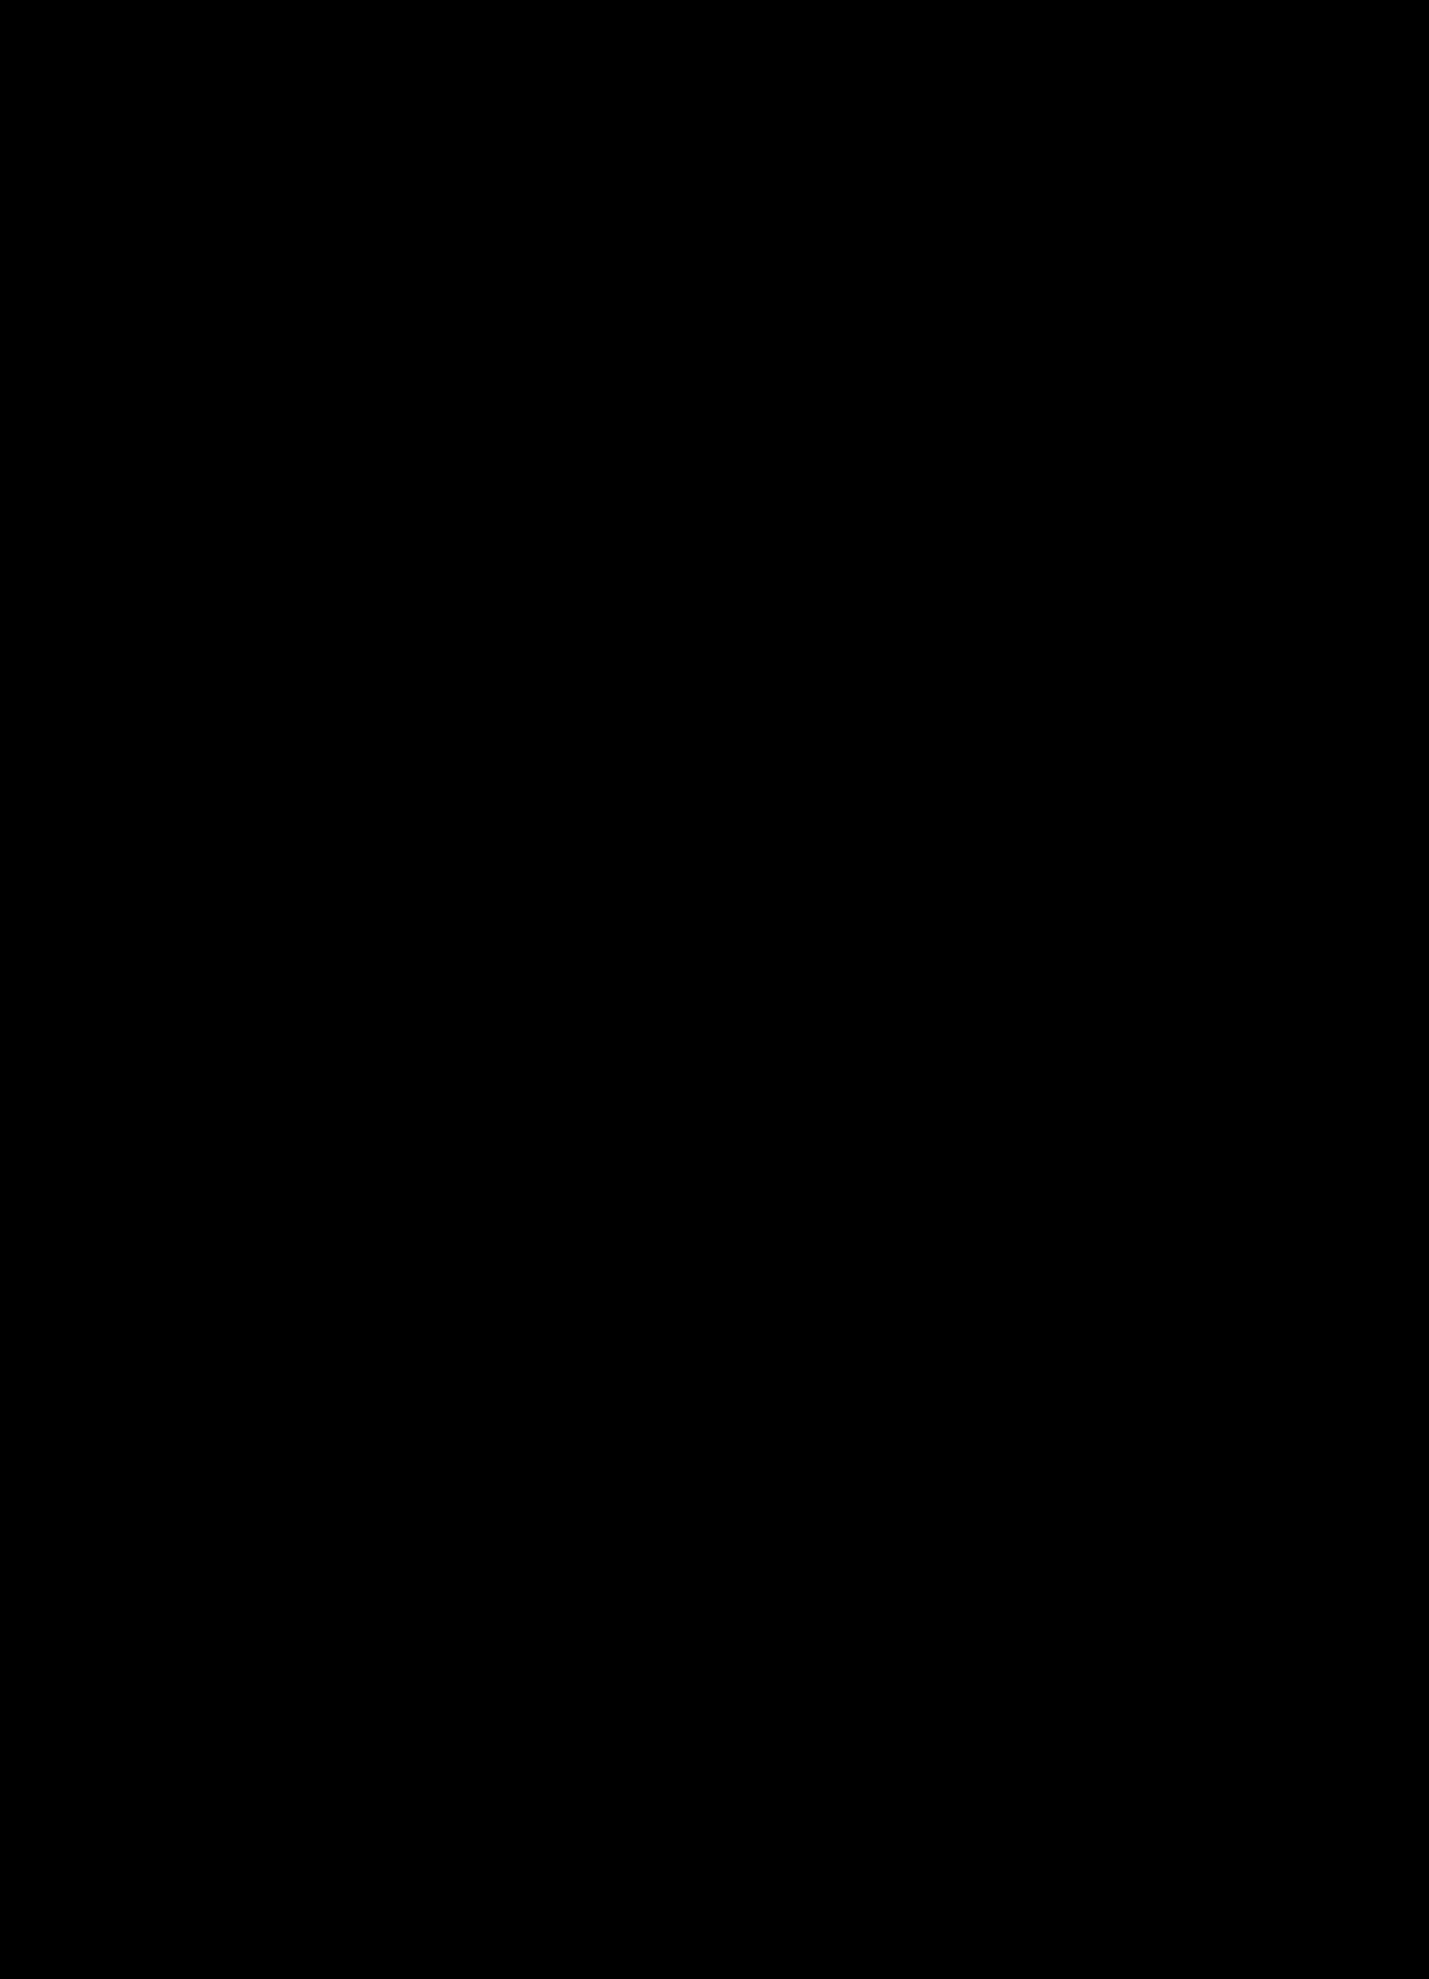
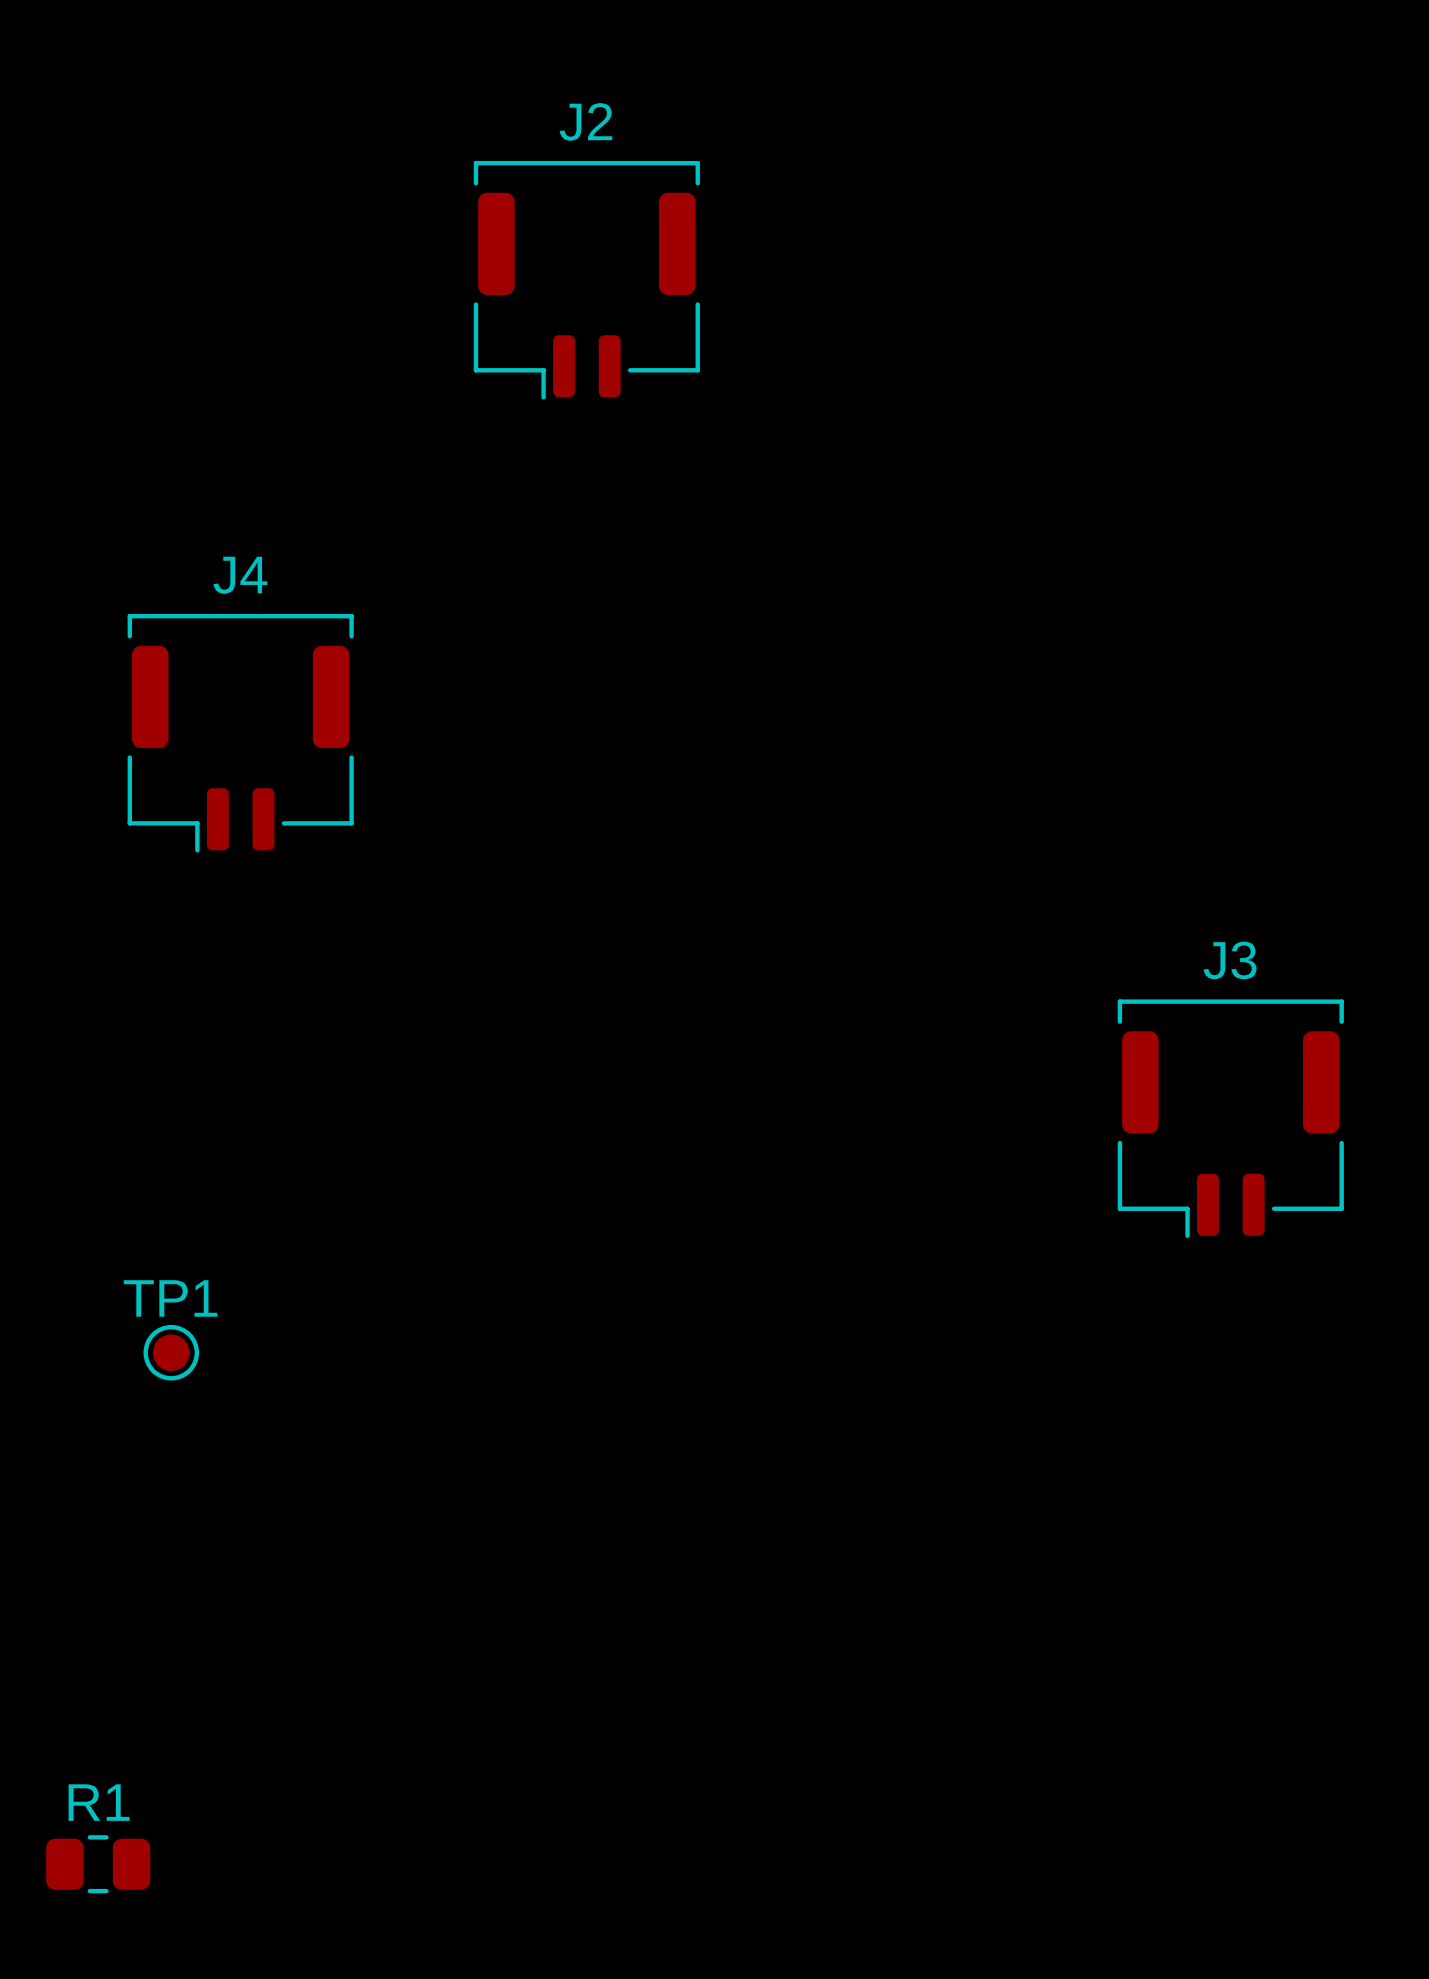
J2: none -> (586, 280)
J4: none -> (240, 733)
J3: none -> (1230, 1118)
TP1: none -> (171, 1352)
R1: none -> (98, 1864)

